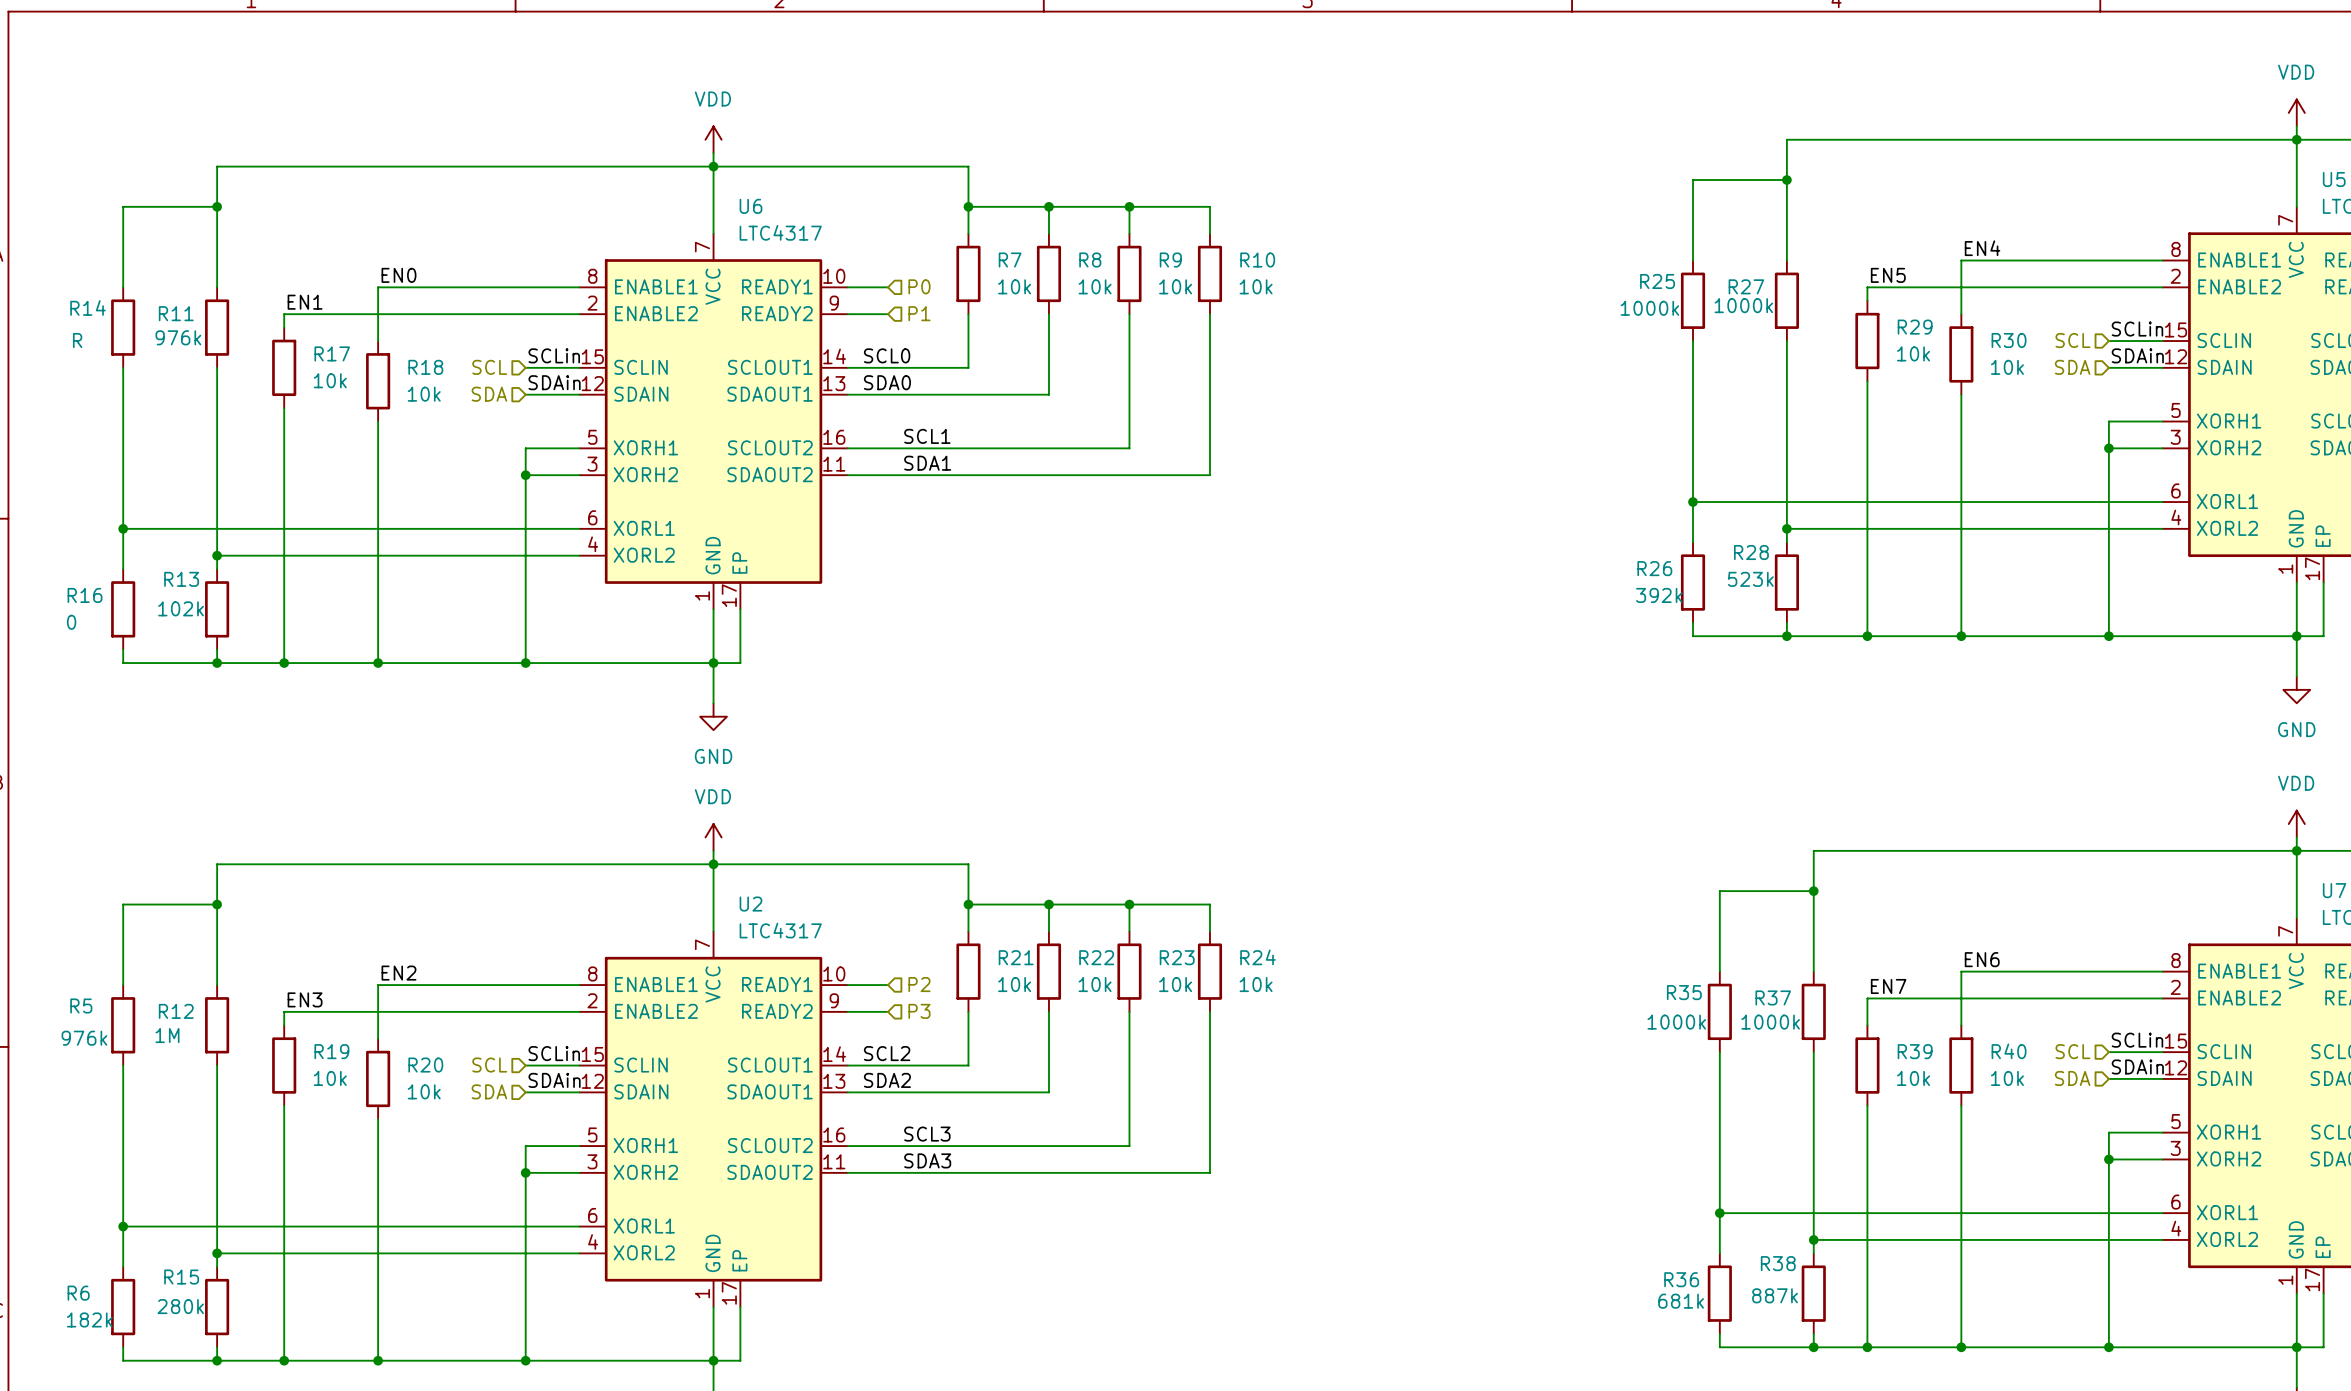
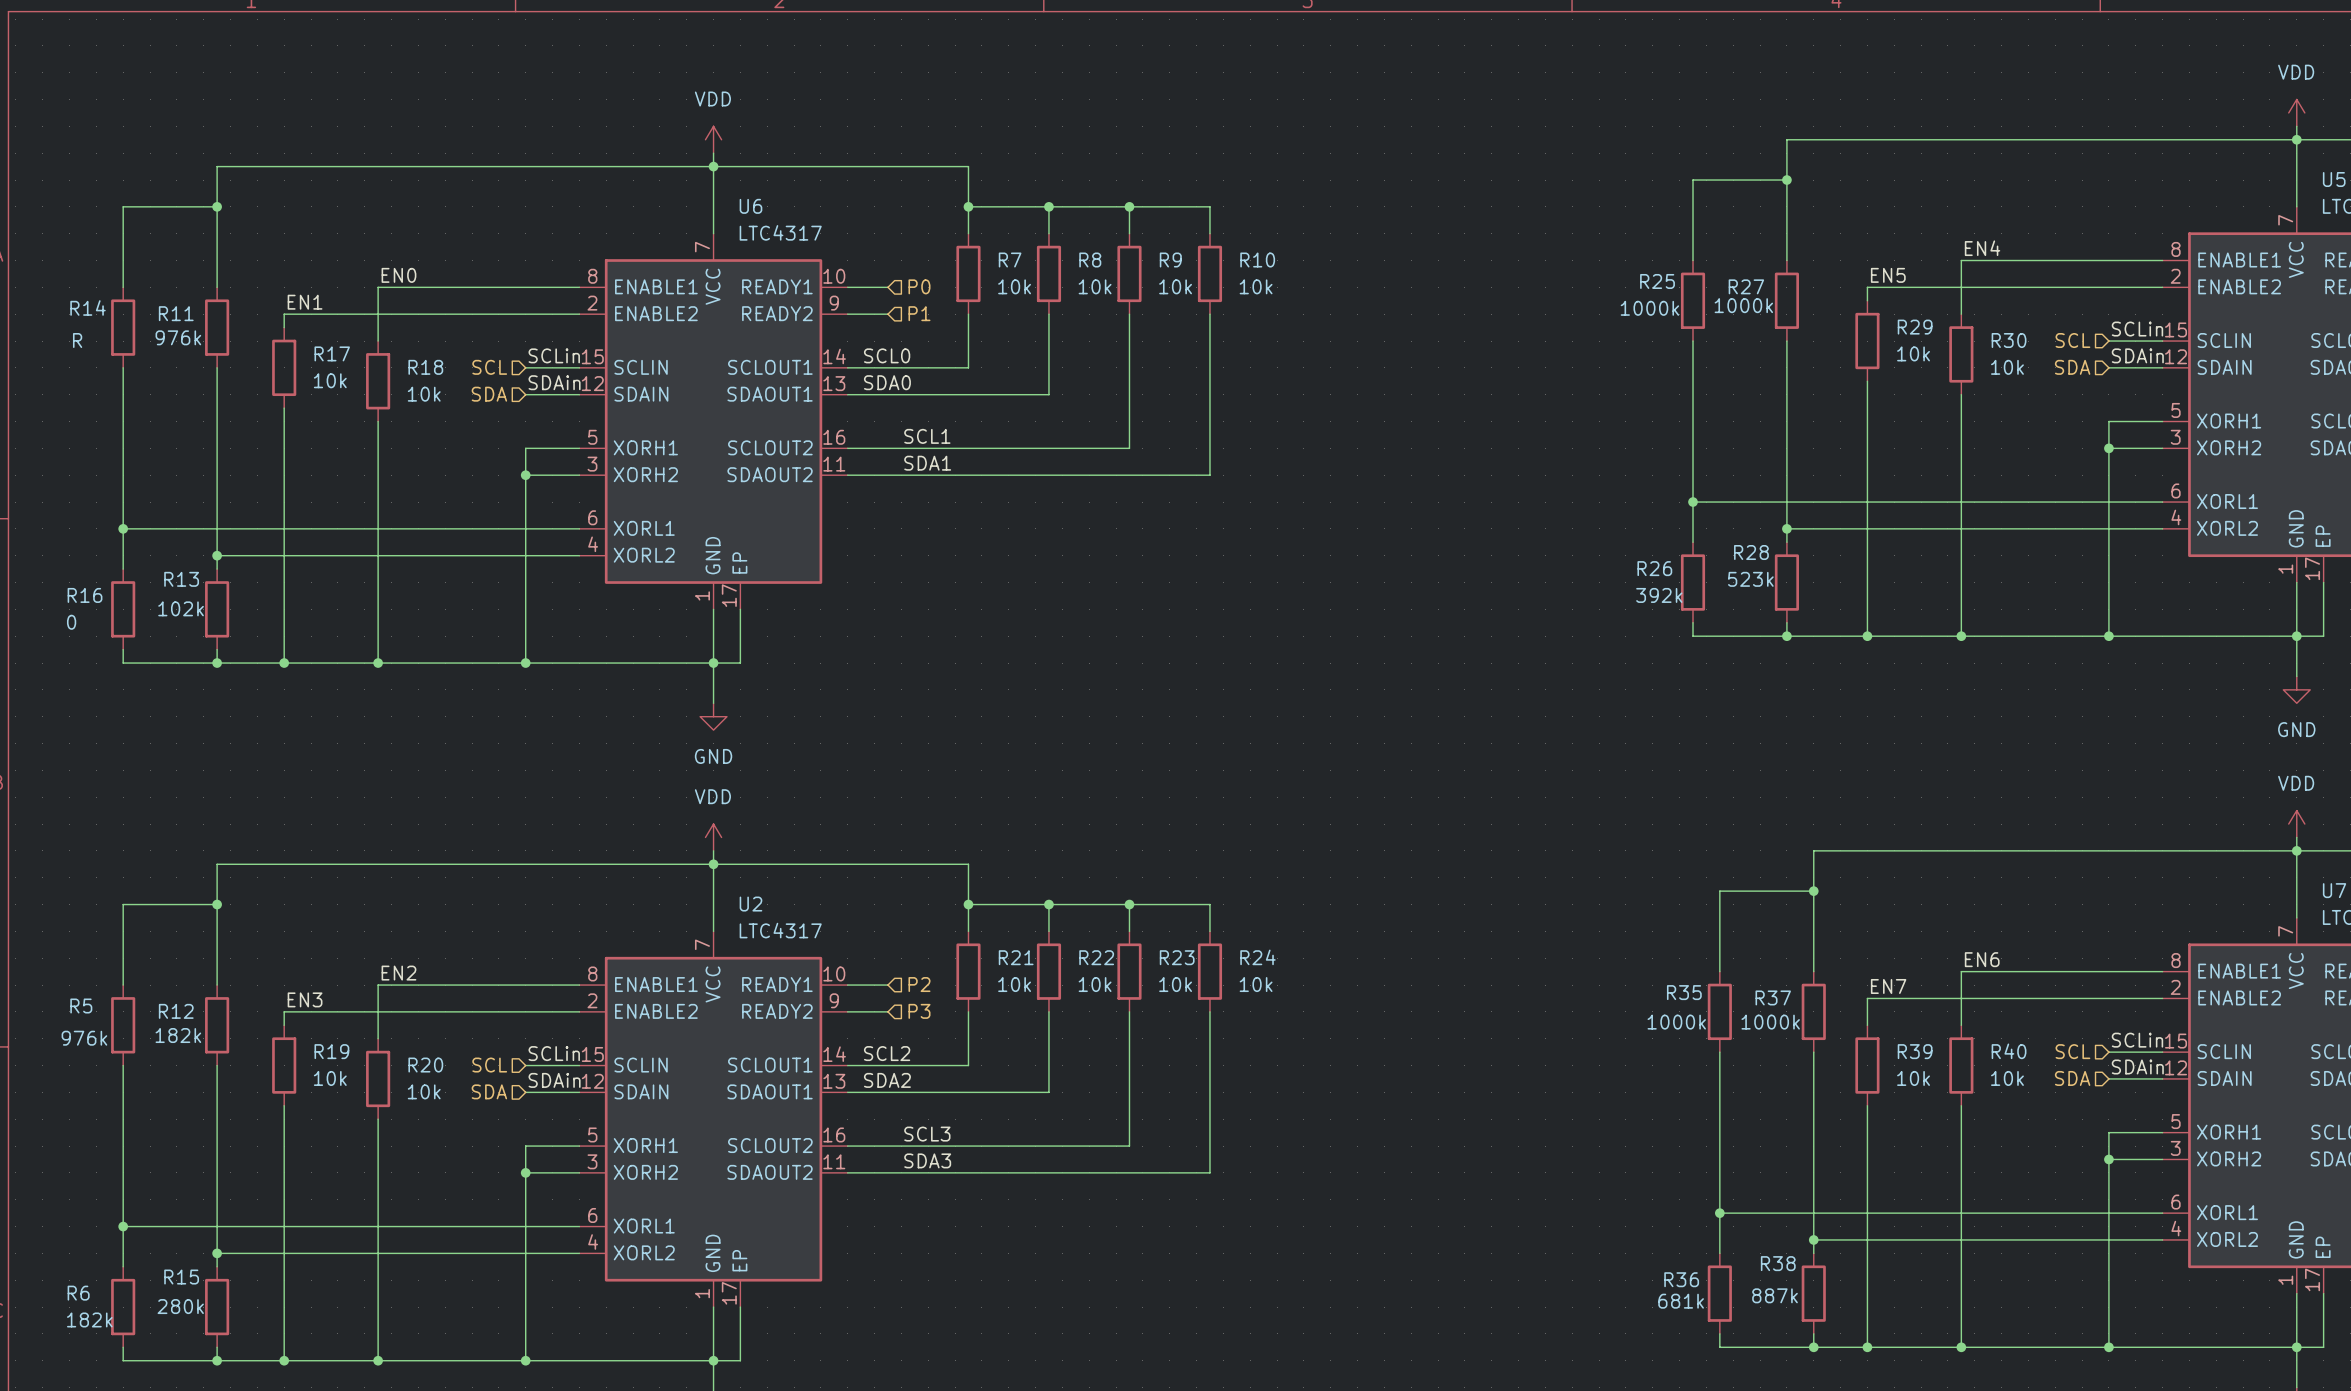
R12 value: 1M (167, 1035) -> 182k (178, 1035)

